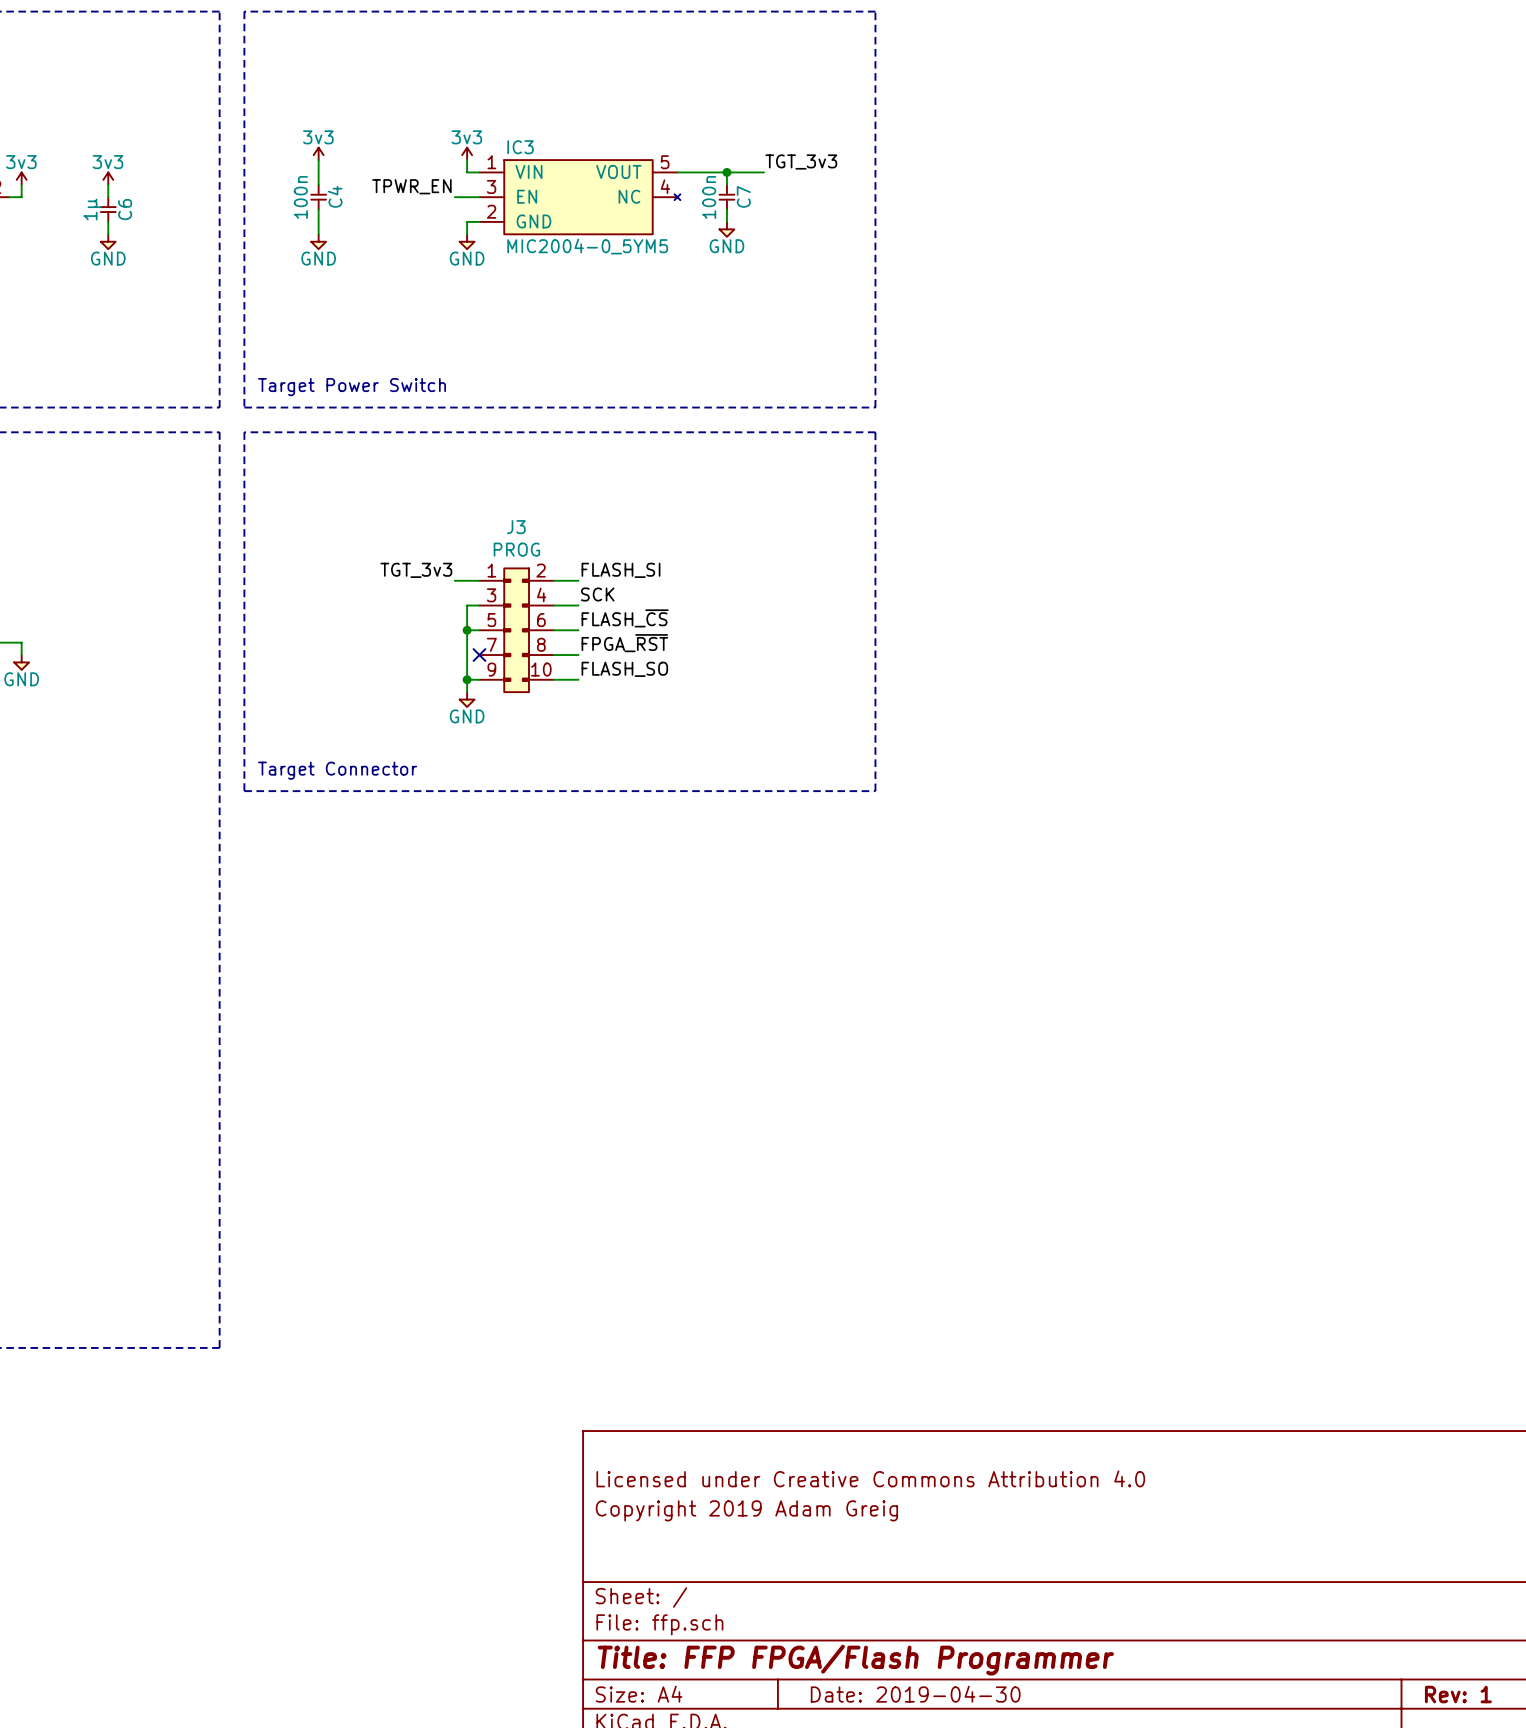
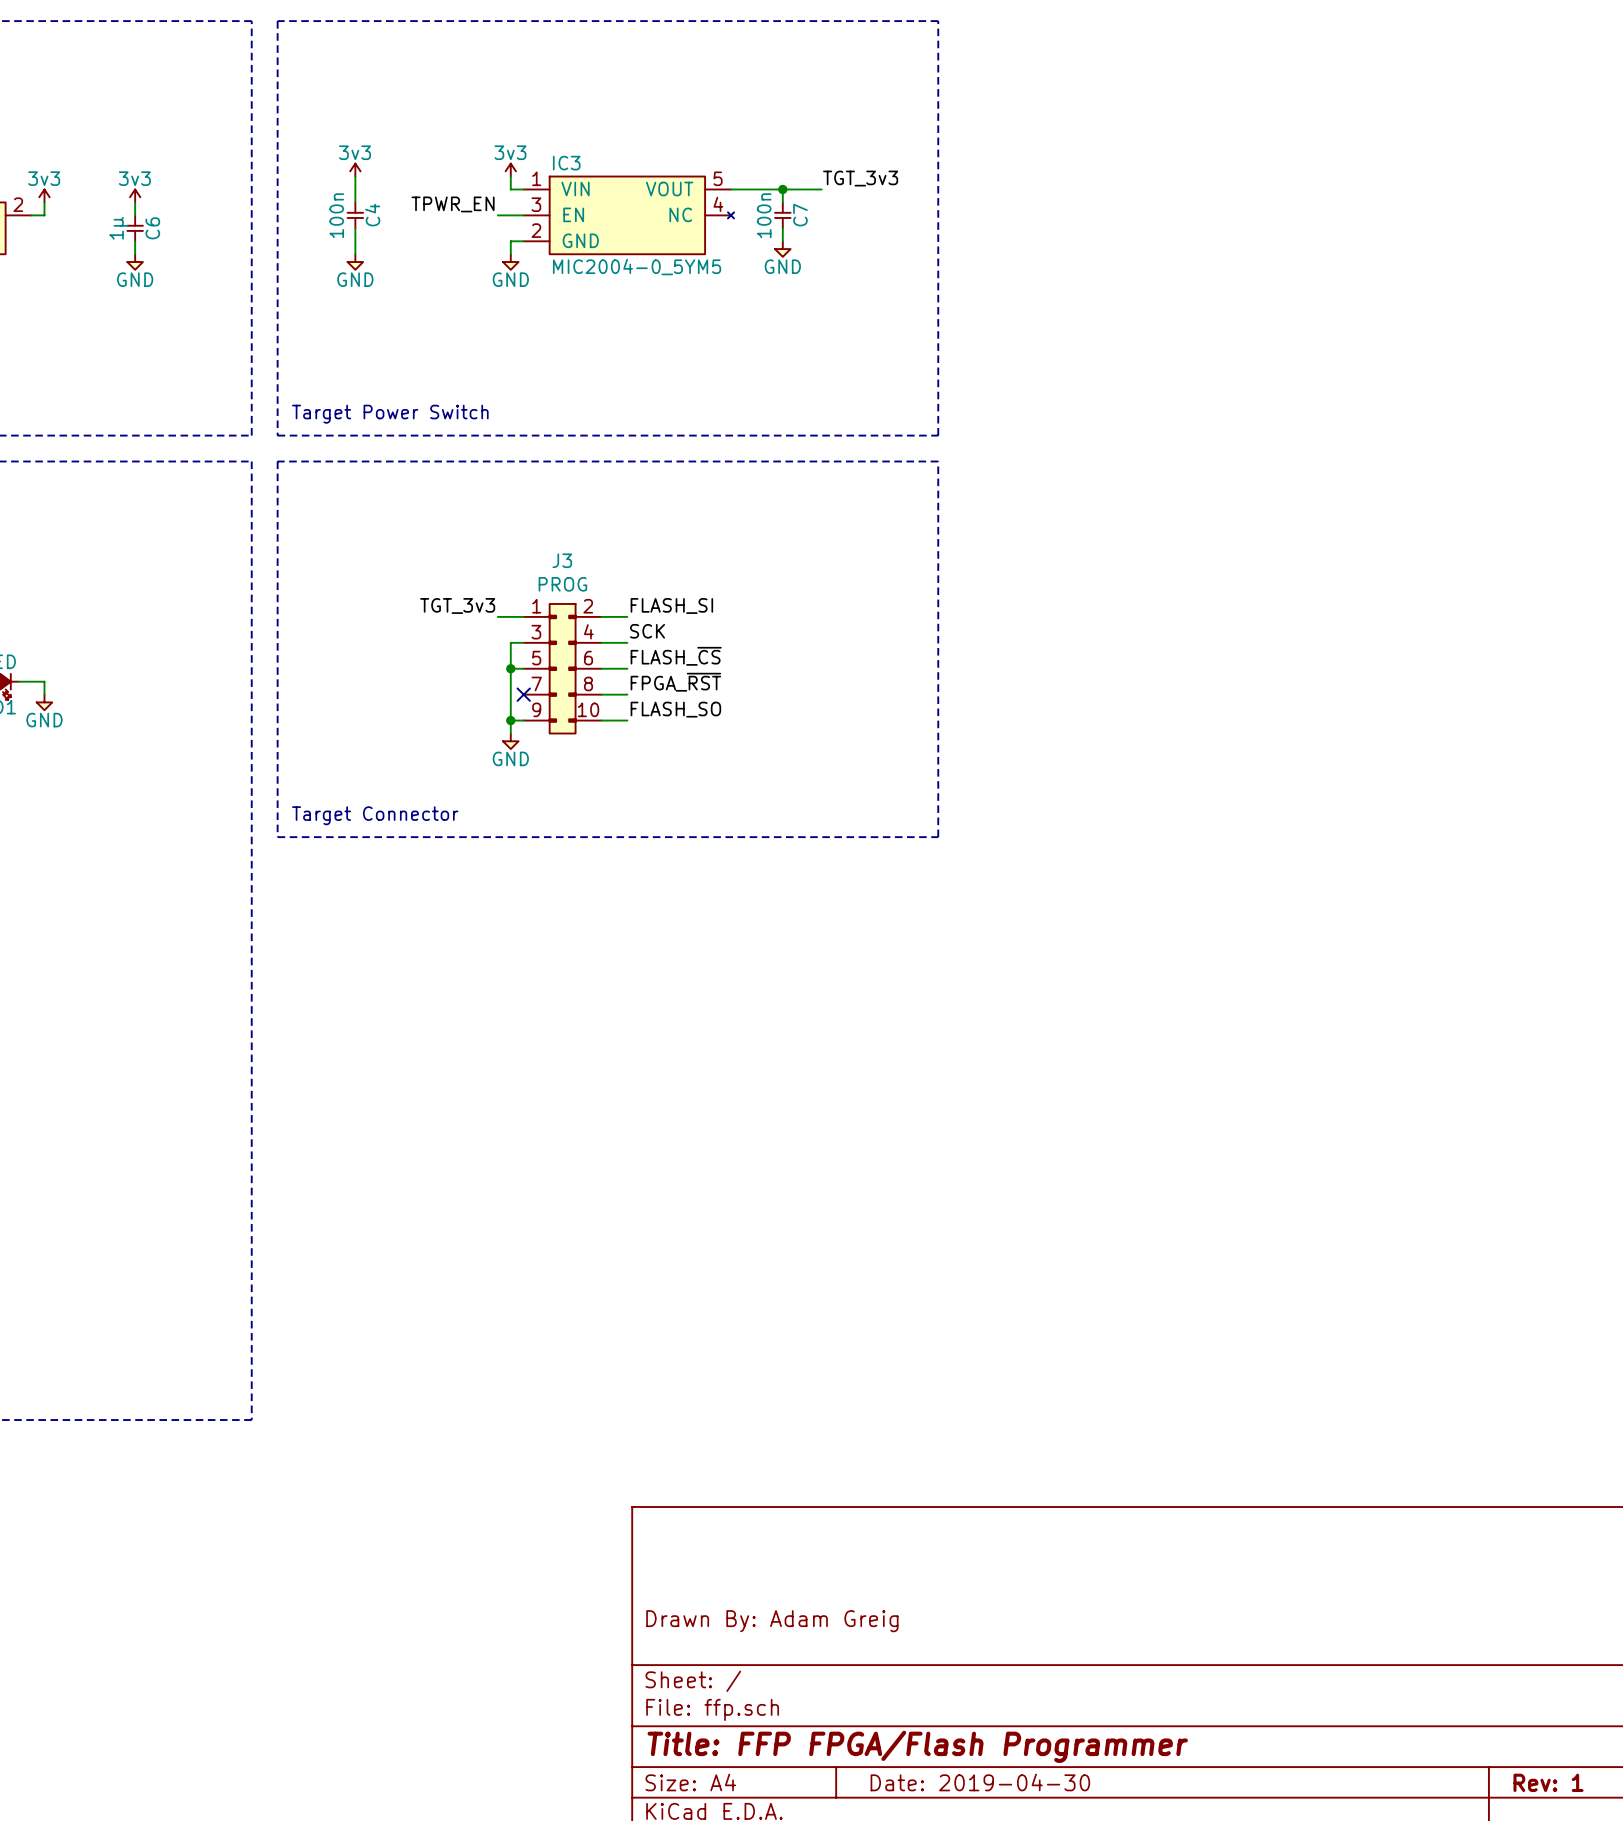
title block: Licensed under Creative Commons Attribution 4.0 (870, 1478) -> none
title block: Copyright 2019 Adam Greig (746, 1510) -> none
title block: none -> Drawn By: Adam Greig (772, 1621)

